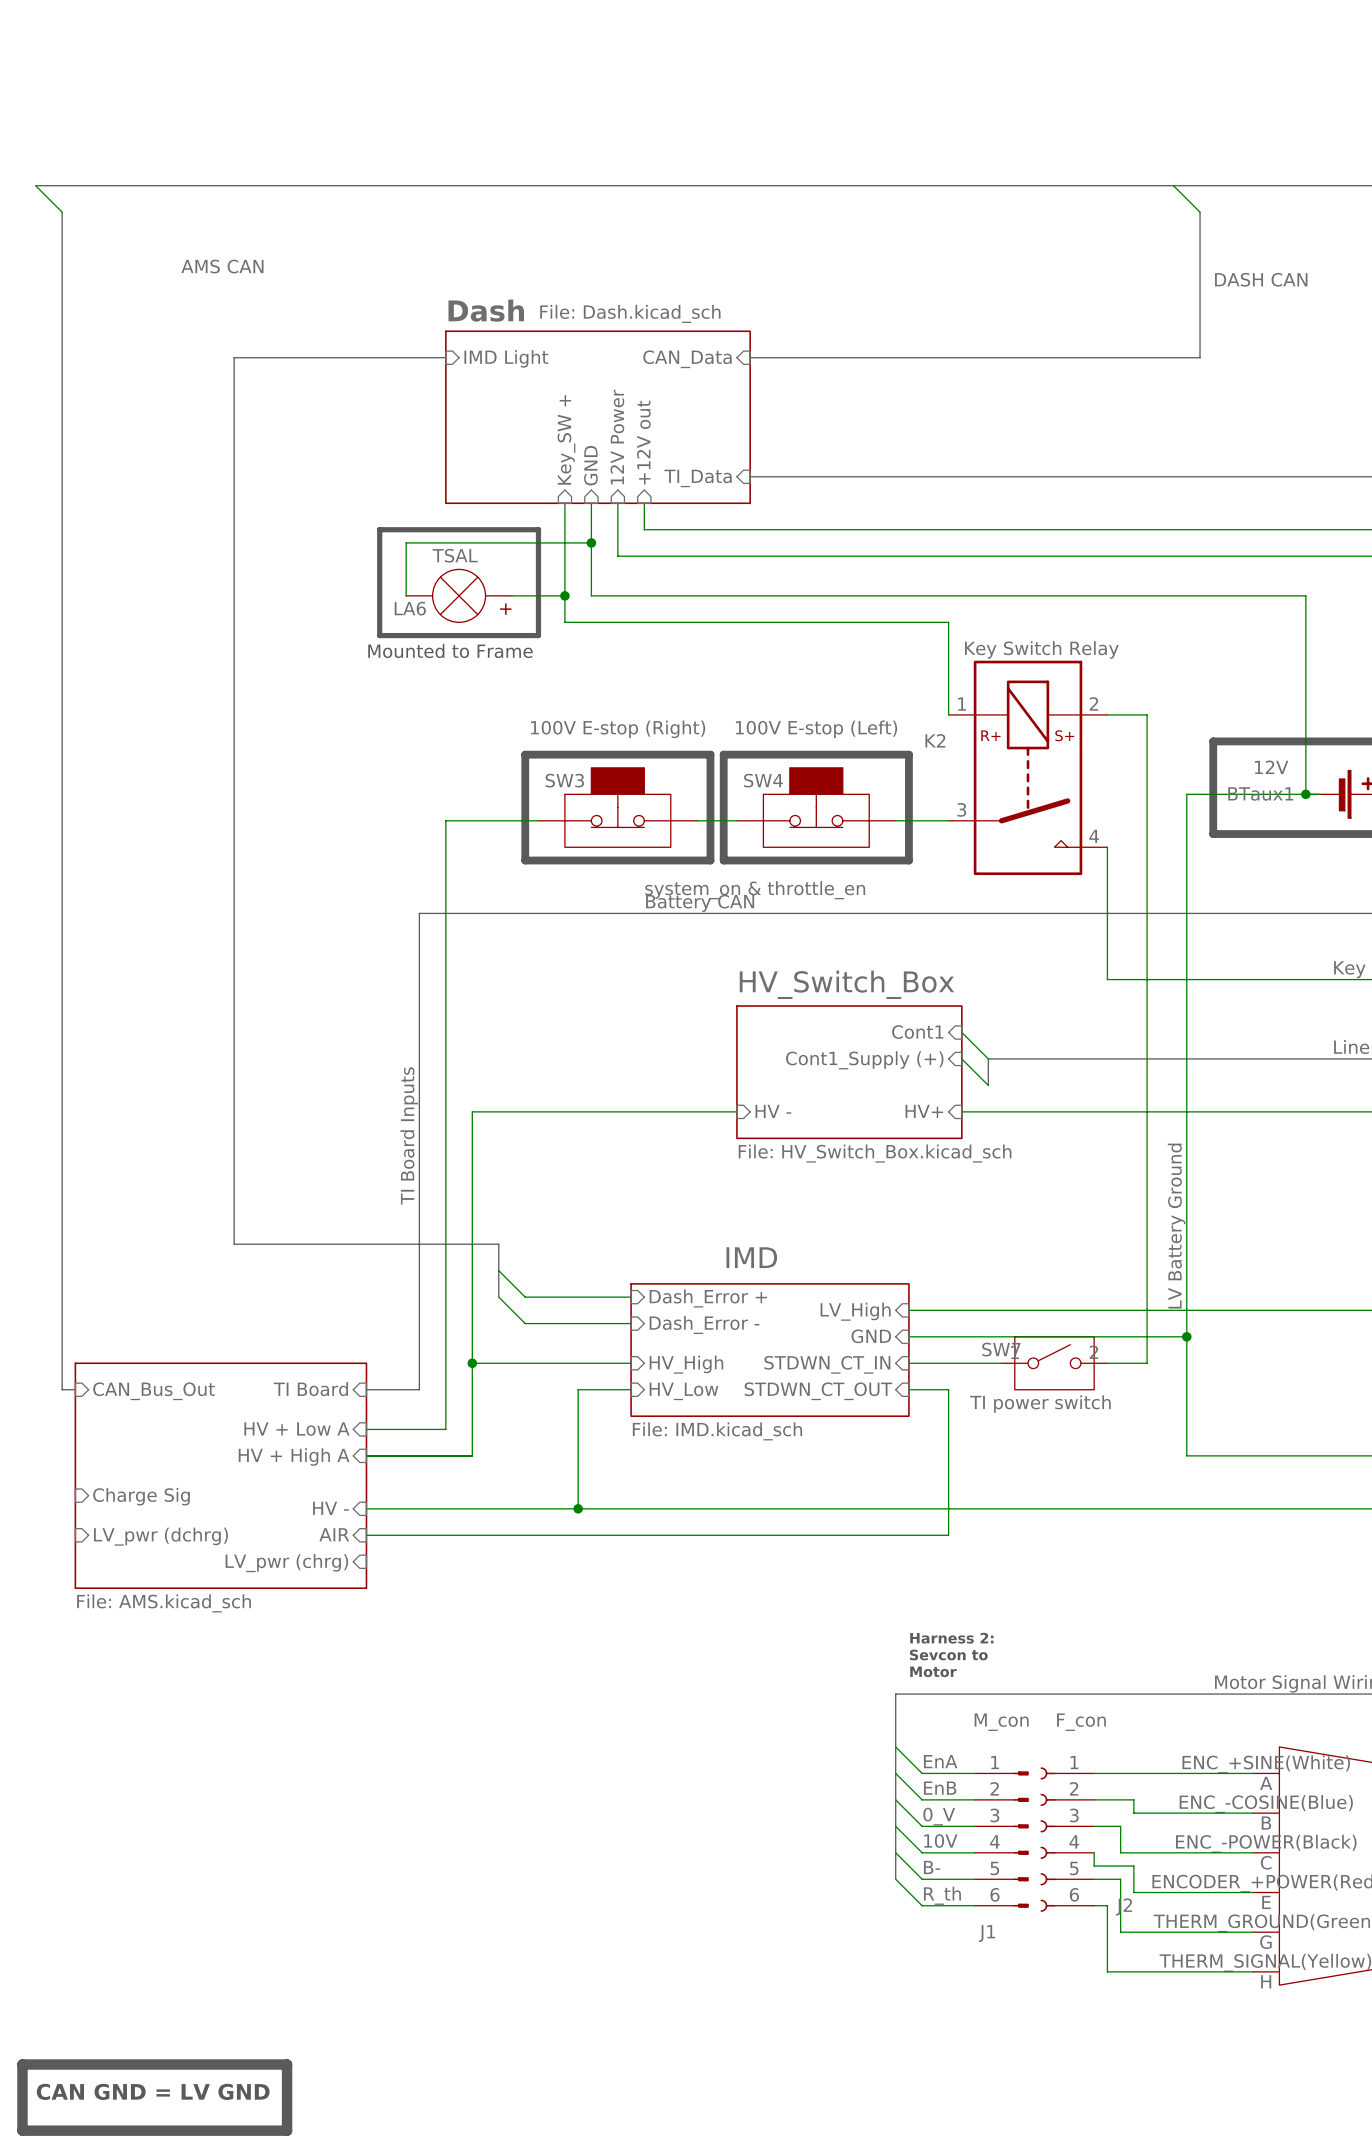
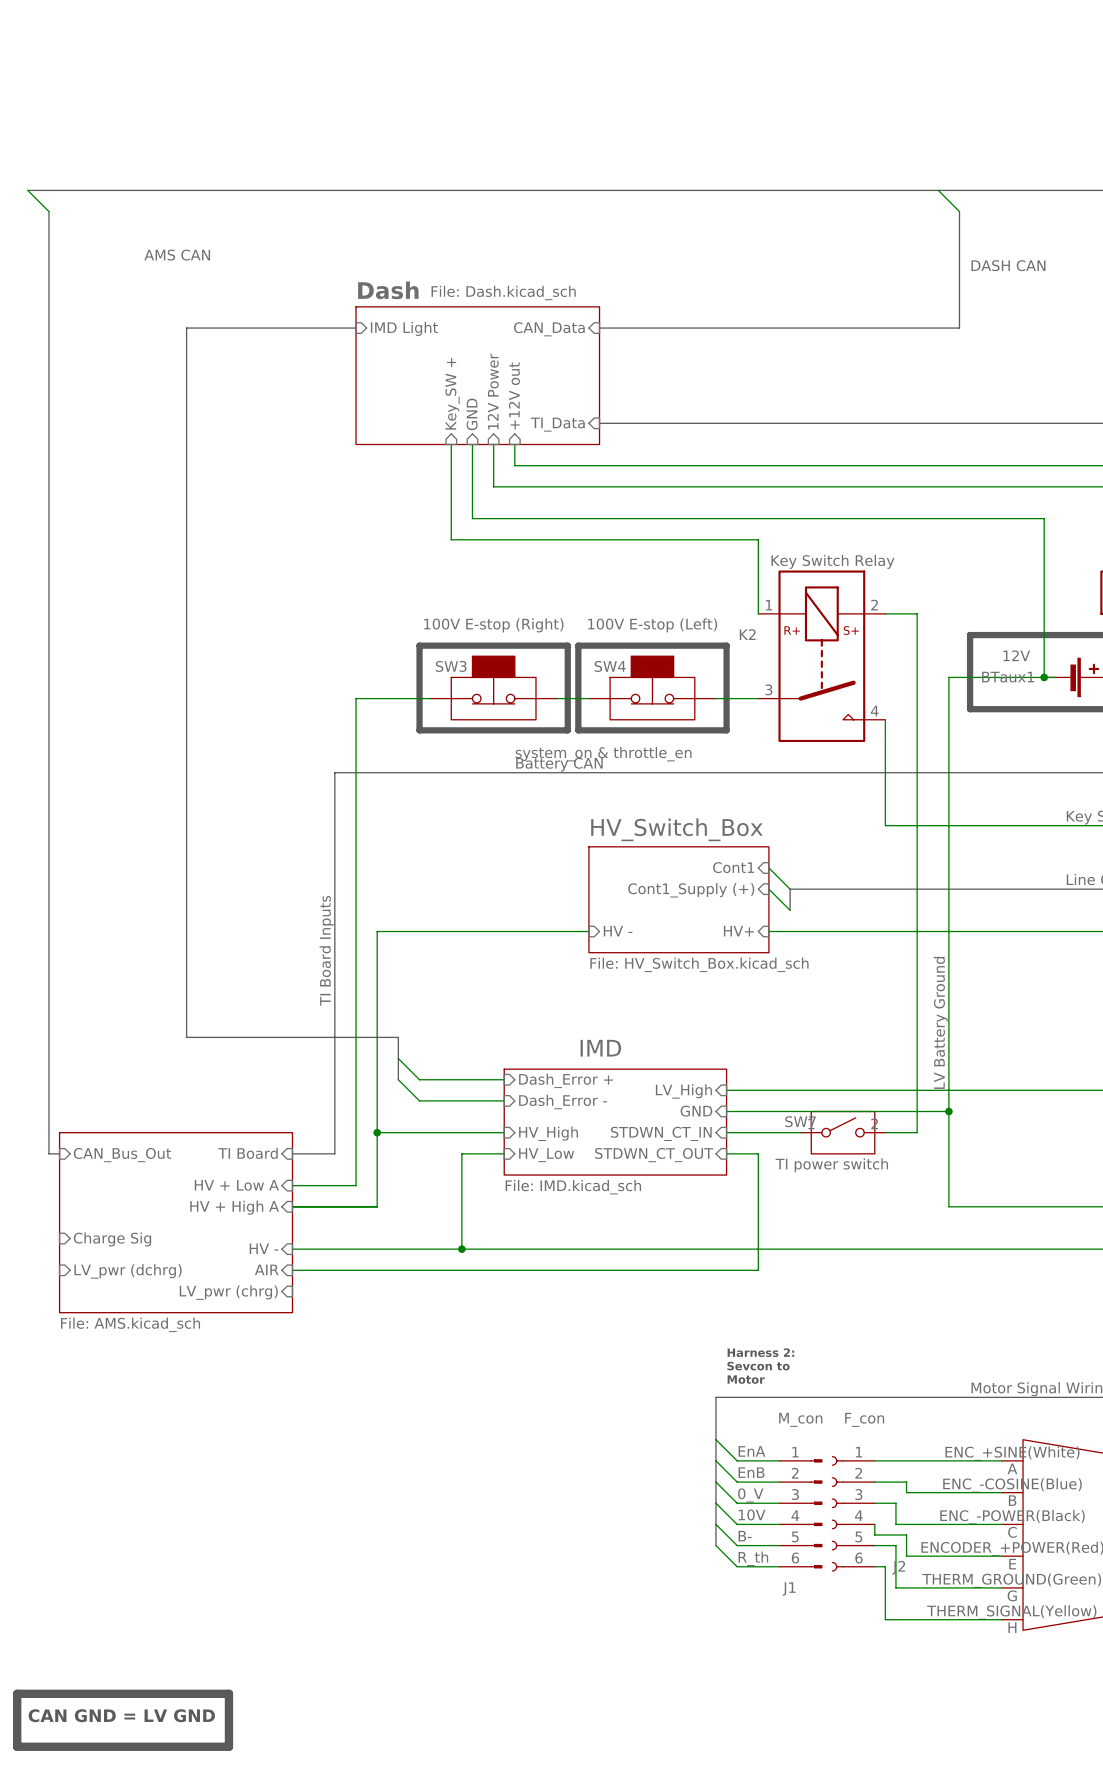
line: (379, 529) (538, 529) (538, 635) (379, 635) (379, 529) -> none
wire: (591, 542) (406, 542) (406, 595) -> none
junction: (591, 542) -> none
LA6: TSAL (459, 595) -> none
wire: (512, 595) (564, 595) -> none
junction: (564, 595) -> none
text: Mounted to Frame (450, 651) -> none

